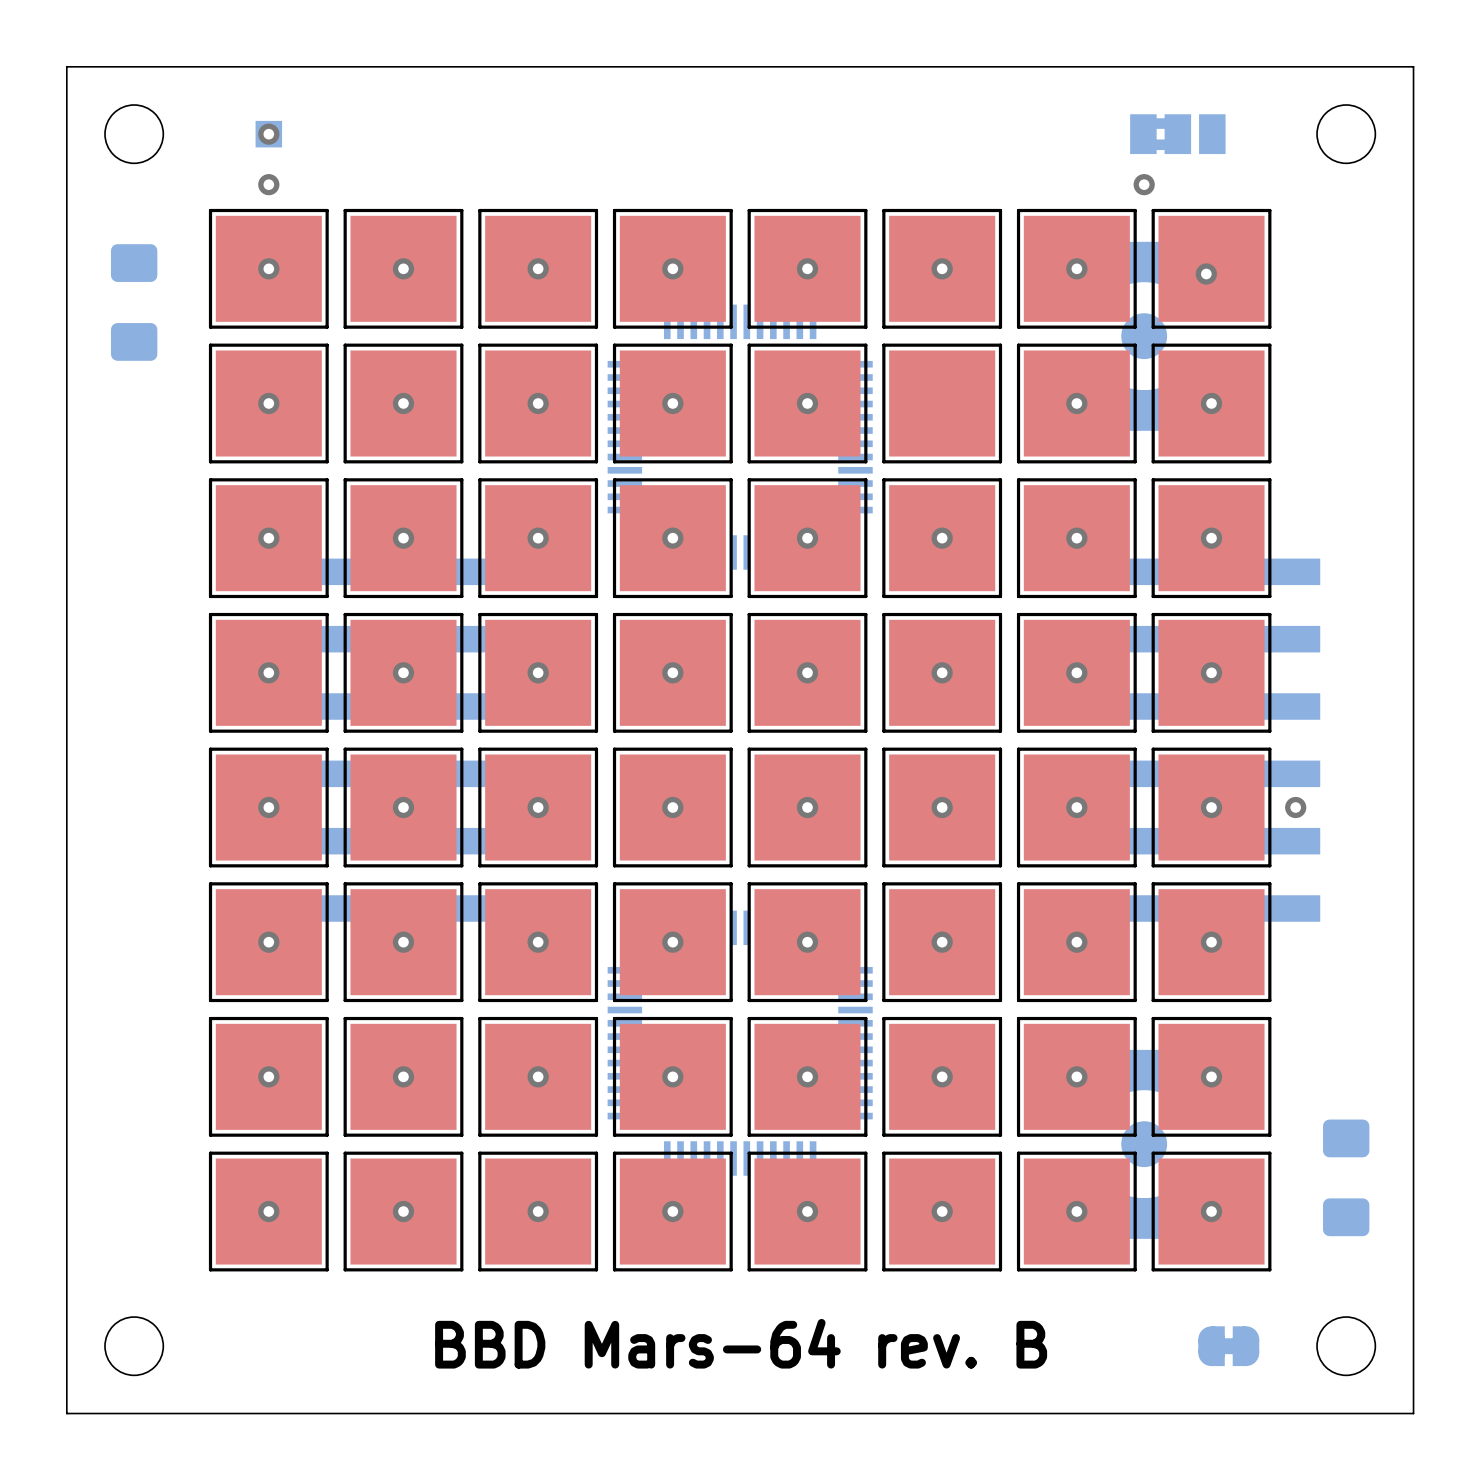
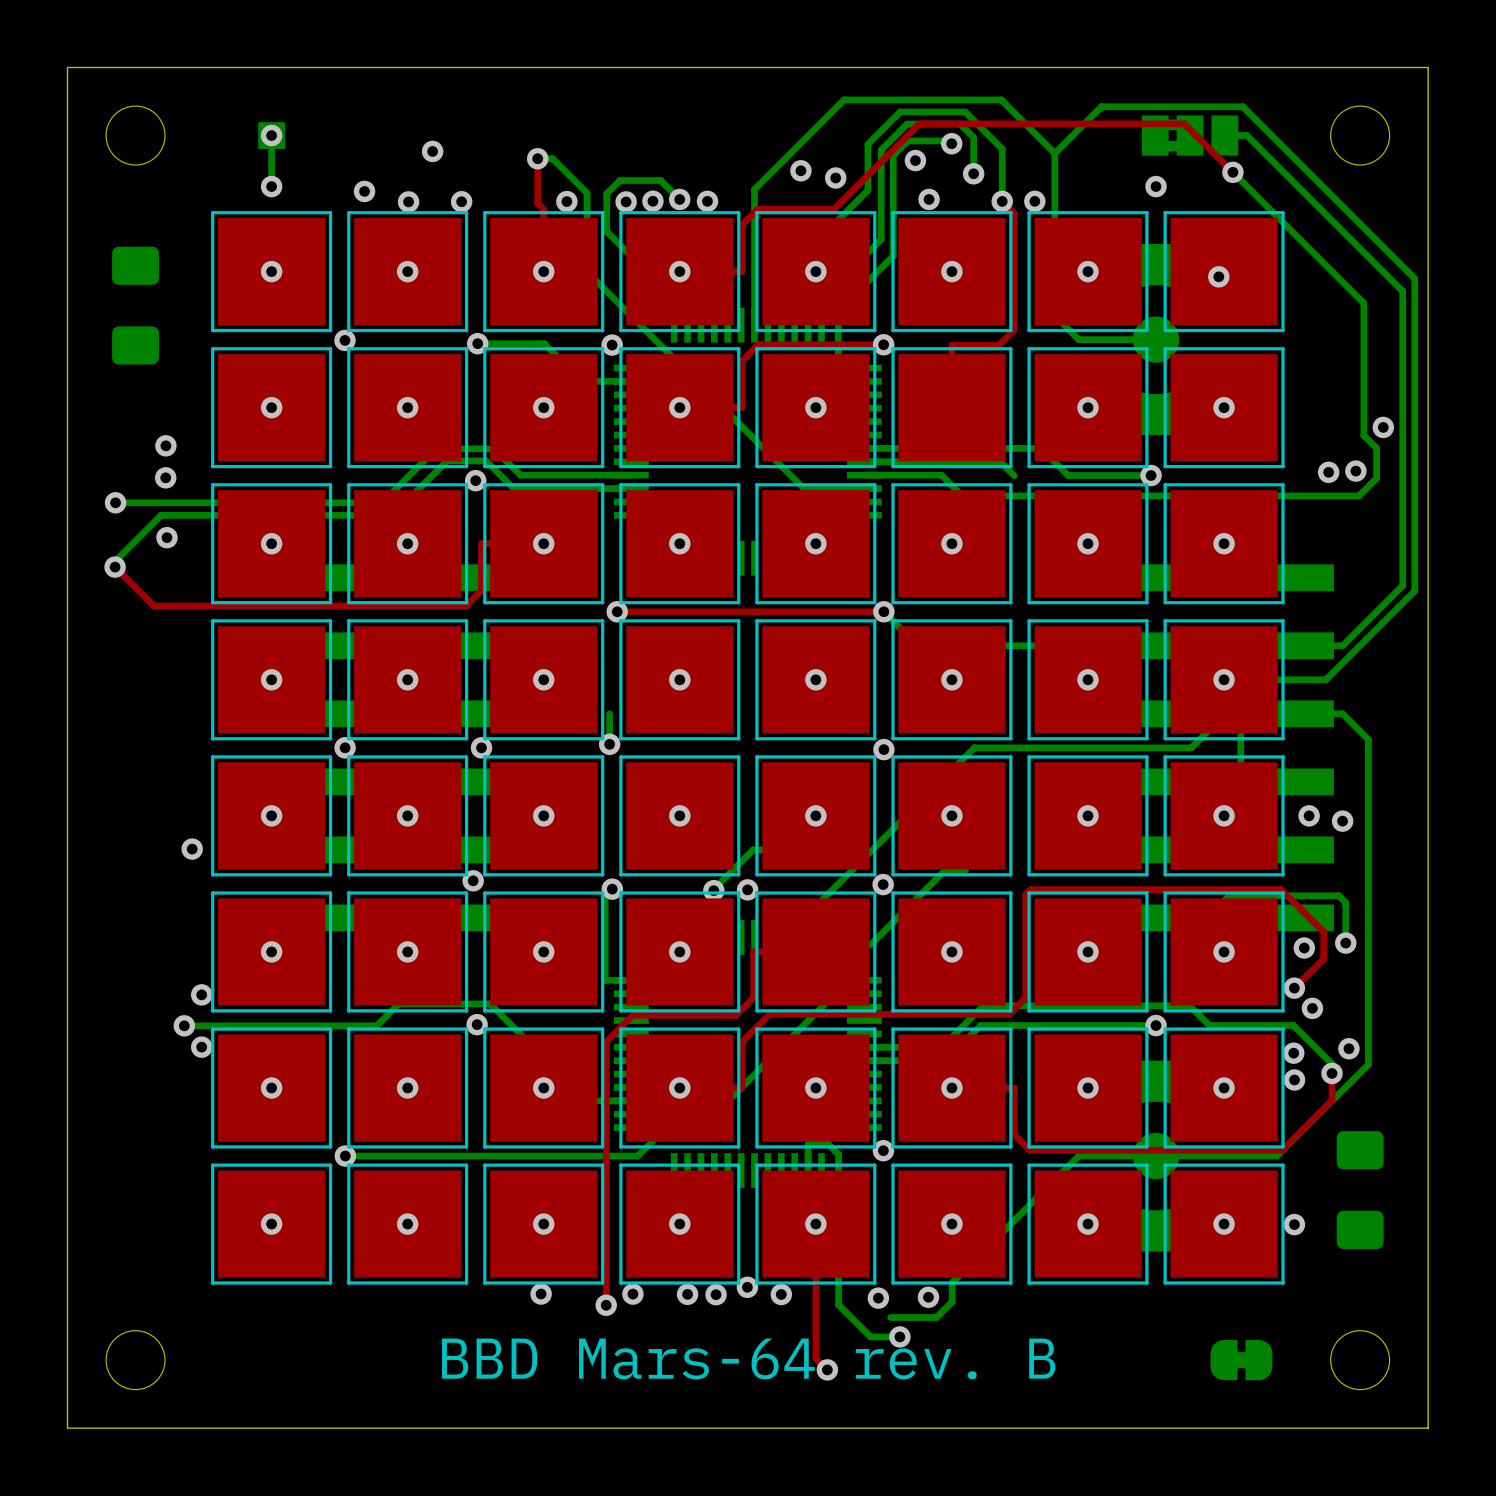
bottom track: none -> (271, 135) (271, 186)
bottom track: none -> (1224, 135) (1246, 135) (1402, 291) (1402, 585) (1342, 645) (917, 645) (883, 611)
bottom track: none -> (951, 143) (948, 140) (907, 140) (893, 155) (893, 256) (838, 311) (838, 381) (864, 381)
via: none -> (951, 143)
via: none -> (432, 151)
bottom track: none -> (1054, 153) (1101, 106) (1242, 106) (1414, 278) (1414, 590) (1325, 679) (1257, 679) (1240, 696) (1240, 781) (1291, 781)
bottom track: none -> (1054, 153) (1001, 99) (844, 99) (754, 189) (754, 325)
bottom track: none -> (1054, 153) (1054, 235) (1050, 239) (1050, 311) (1078, 339) (1156, 339)
bottom track: none -> (537, 158) (552, 158) (587, 193) (587, 271) (803, 488) (864, 488)
top track: none -> (537, 158) (537, 203) (543, 209) (543, 271)
via: none -> (537, 158)
via: none -> (915, 160)
via: none -> (800, 170)
bottom track: none -> (1232, 172) (1363, 303) (1363, 435) (1376, 448) (1376, 478) (1358, 495) (962, 495) (941, 475) (864, 475)
top track: none -> (1232, 172) (1184, 123) (919, 123) (833, 209) (757, 209) (742, 224) (742, 271) (679, 271)
via: none -> (1232, 172)
bottom track: none -> (973, 173) (973, 137) (960, 124) (907, 124) (881, 150) (881, 239) (821, 299) (821, 325)
via: none -> (973, 173)
via: none -> (835, 178)
via: none -> (364, 191)
bottom track: none -> (679, 199) (660, 180) (619, 180) (606, 193) (606, 231) (674, 299) (674, 325)
via: none -> (679, 199)
via: none -> (929, 199)
via: none -> (408, 201)
via: none -> (461, 201)
via: none -> (566, 201)
via: none -> (626, 201)
via: none -> (652, 201)
via: none -> (707, 201)
bottom track: none -> (1002, 201) (1002, 148) (965, 111) (900, 111) (867, 144) (867, 190) (808, 250) (808, 325)
top track: none -> (1002, 201) (1014, 213) (1014, 329) (998, 345) (951, 345) (951, 407)
via: none -> (1002, 201)
via: none -> (1034, 201)
via: none -> (344, 340)
bottom track: none -> (477, 343) (544, 343) (582, 381) (631, 381)
via: none -> (477, 343)
via: none -> (612, 345)
top track: none -> (883, 344) (758, 344) (742, 360) (742, 407) (679, 407)
via: none -> (883, 344)
via: none -> (1383, 427)
via: none -> (165, 445)
bottom track: none -> (864, 448) (1041, 448) (1068, 475) (1151, 475)
bottom track: none -> (864, 461) (1000, 461) (1014, 475)
via: none -> (1355, 471)
via: none -> (1328, 472)
bottom track: none -> (631, 475) (520, 475) (494, 448) (436, 448) (382, 502) (115, 502)
via: none -> (1151, 475)
via: none -> (165, 477)
via: none -> (475, 480)
bottom track: none -> (631, 488) (513, 488) (486, 460) (447, 460) (392, 515) (161, 515) (115, 561) (115, 567)
via: none -> (115, 502)
via: none -> (166, 537)
top track: none -> (543, 543) (481, 543) (481, 590) (465, 606) (153, 606) (115, 567)
via: none -> (115, 567)
top track: none -> (617, 611) (883, 611)
via: none -> (617, 611)
via: none -> (883, 611)
bottom track: none -> (1207, 645) (1207, 731) (1191, 747) (974, 747) (821, 900)
bottom track: none -> (609, 713) (609, 744)
bottom track: none -> (1291, 713) (1342, 713) (1368, 739) (1368, 1064) (1276, 1156) (1078, 1156) (952, 1282) (952, 1301) (936, 1317) (890, 1317)
via: none -> (609, 744)
via: none -> (345, 747)
via: none -> (481, 747)
via: none -> (883, 749)
via: none -> (1342, 821)
via: none -> (192, 849)
bottom track: none -> (768, 849) (753, 849) (713, 890)
bottom track: none -> (965, 870) (945, 870) (870, 945)
via: none -> (473, 880)
via: none -> (883, 884)
bottom track: none -> (612, 889) (605, 896) (605, 980) (631, 980)
via: none -> (612, 889)
via: none -> (747, 889)
via: none -> (713, 890)
bottom track: none -> (1156, 917) (1207, 917) (1229, 895) (1338, 895) (1345, 902) (1345, 943)
via: none -> (1345, 943)
via: none -> (1304, 948)
top track: none -> (815, 951) (753, 951) (753, 997) (735, 1015) (632, 1015) (606, 1041) (606, 1305)
via: (807, 942) -> none
top track: none -> (1294, 988) (1323, 958) (1323, 932) (1281, 889) (1030, 889) (1025, 894) (1025, 997) (1009, 1014) (769, 1014) (742, 1041) (742, 1088) (679, 1088)
via: none -> (1294, 988)
bottom track: none -> (864, 993) (835, 993) (707, 1122) (671, 1122) (637, 1156) (345, 1156)
via: none -> (201, 994)
via: none -> (1312, 1008)
via: none -> (477, 1024)
bottom track: none -> (184, 1025) (376, 1025) (398, 1003) (490, 1003) (587, 1100) (631, 1100)
via: none -> (184, 1025)
bottom track: none -> (1156, 1025) (980, 1025) (945, 1060) (864, 1060)
via: none -> (1156, 1025)
via: none -> (201, 1047)
bottom track: none -> (864, 1047) (941, 1047) (983, 1005) (1189, 1005) (1209, 1025) (1293, 1025) (1332, 1063) (1332, 1073)
via: none -> (1348, 1048)
via: none -> (1293, 1053)
top track: none -> (1332, 1073) (1332, 1100) (1282, 1150) (1029, 1150) (1014, 1134) (1014, 1088) (951, 1088)
via: none -> (1332, 1073)
via: none -> (1294, 1079)
via: none -> (883, 1150)
via: none -> (345, 1156)
bottom track: none -> (808, 1170) (808, 1144) (828, 1144) (838, 1154) (838, 1304) (870, 1336) (899, 1336)
top track: none -> (815, 1224) (815, 1358) (827, 1369)
via: none -> (1294, 1224)
via: none -> (747, 1287)
via: none -> (541, 1294)
via: none -> (632, 1294)
via: none -> (687, 1294)
via: none -> (716, 1294)
via: none -> (781, 1294)
via: none -> (928, 1297)
via: none -> (878, 1298)
via: none -> (606, 1305)
via: none -> (899, 1336)
via: none -> (827, 1369)

